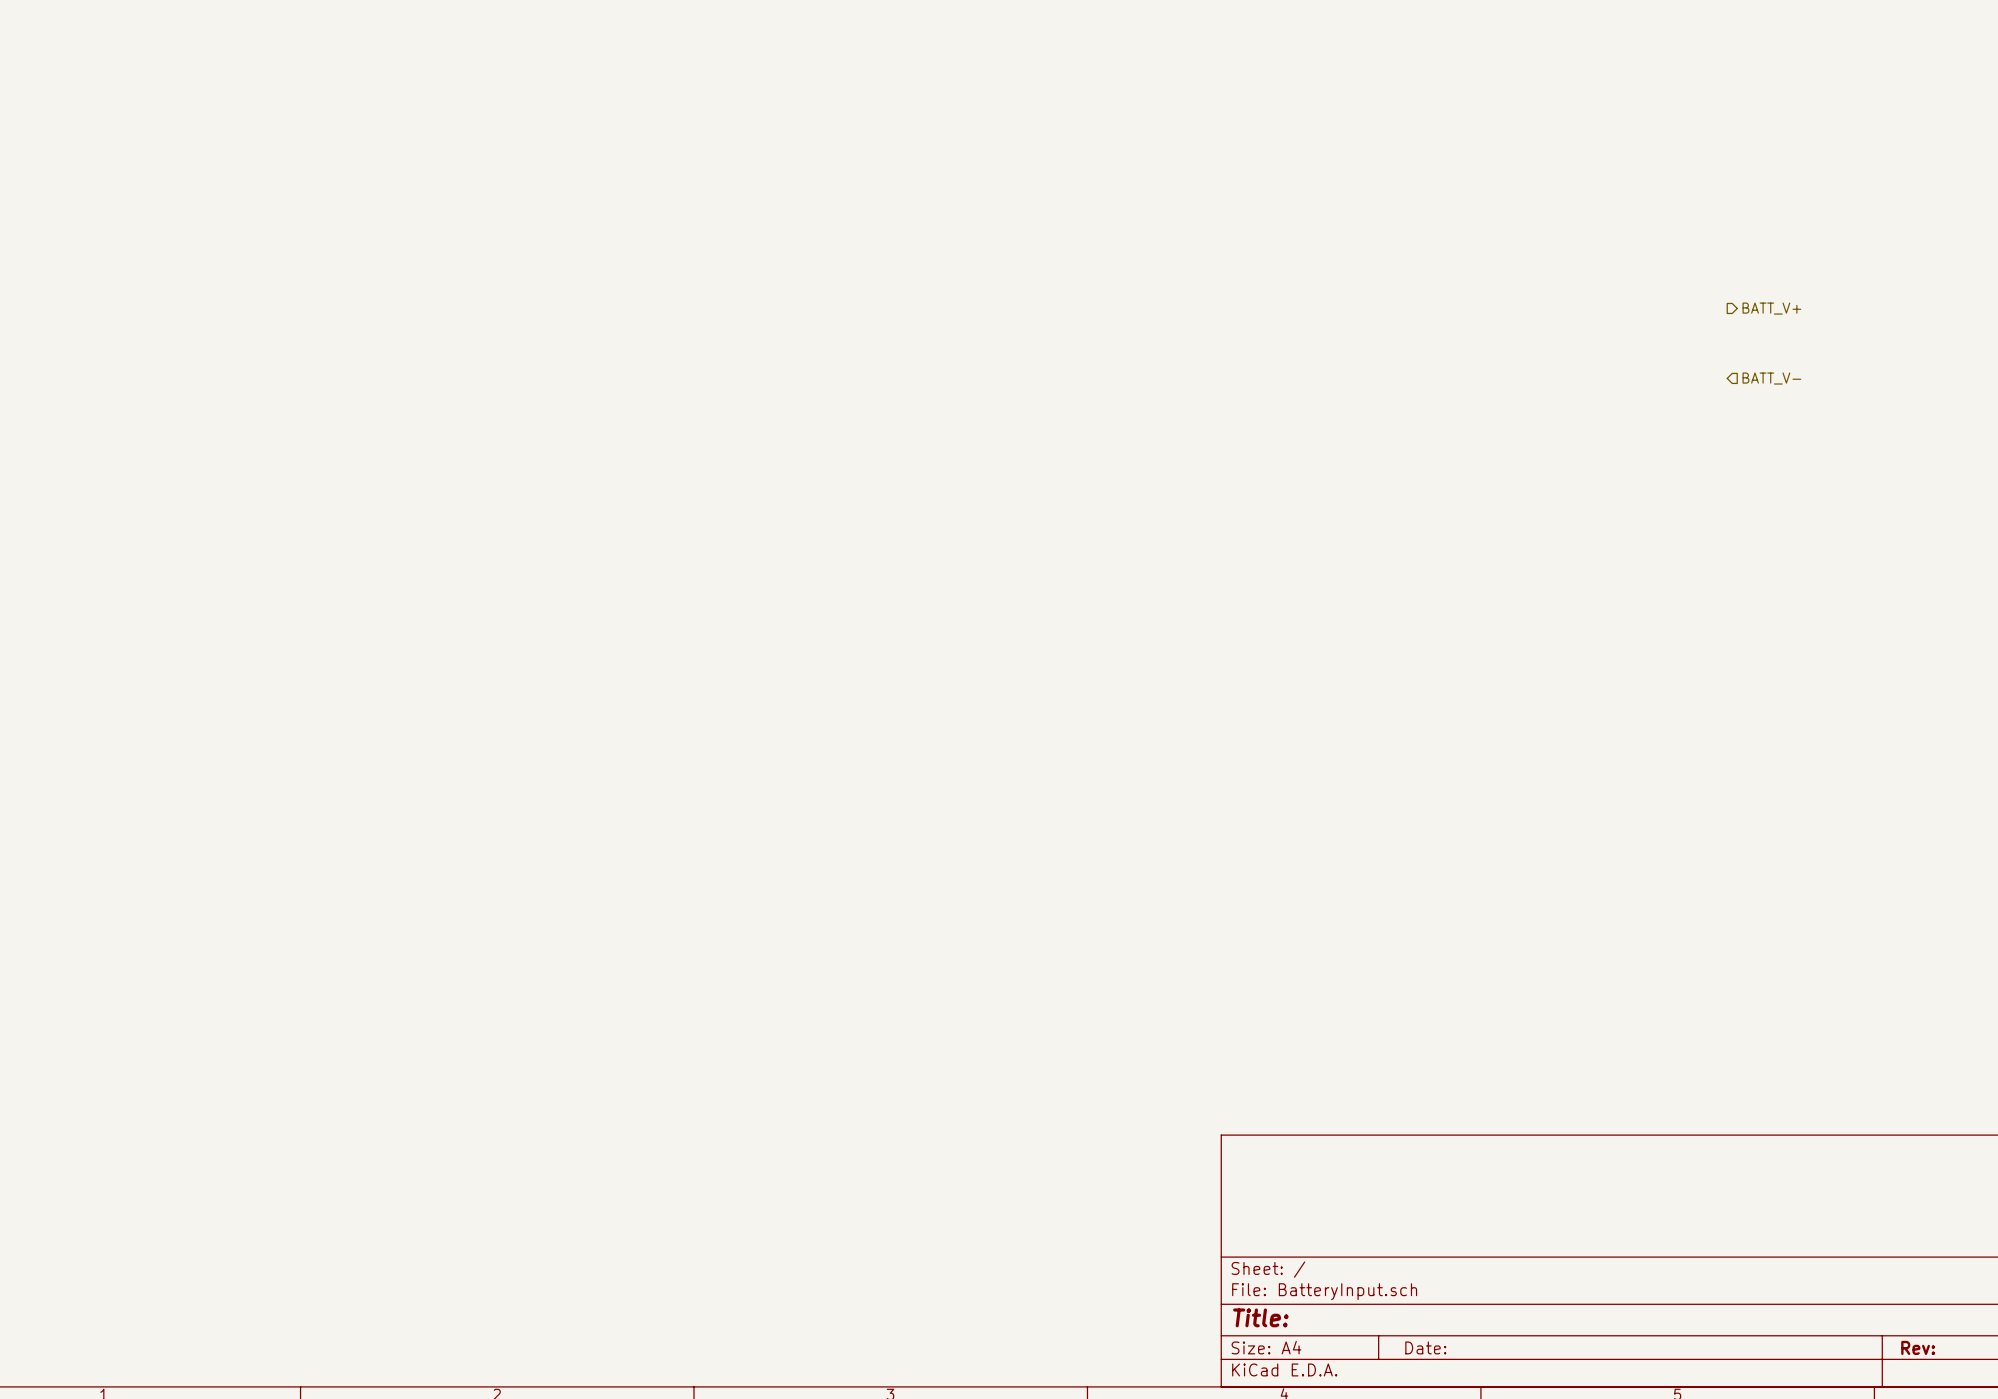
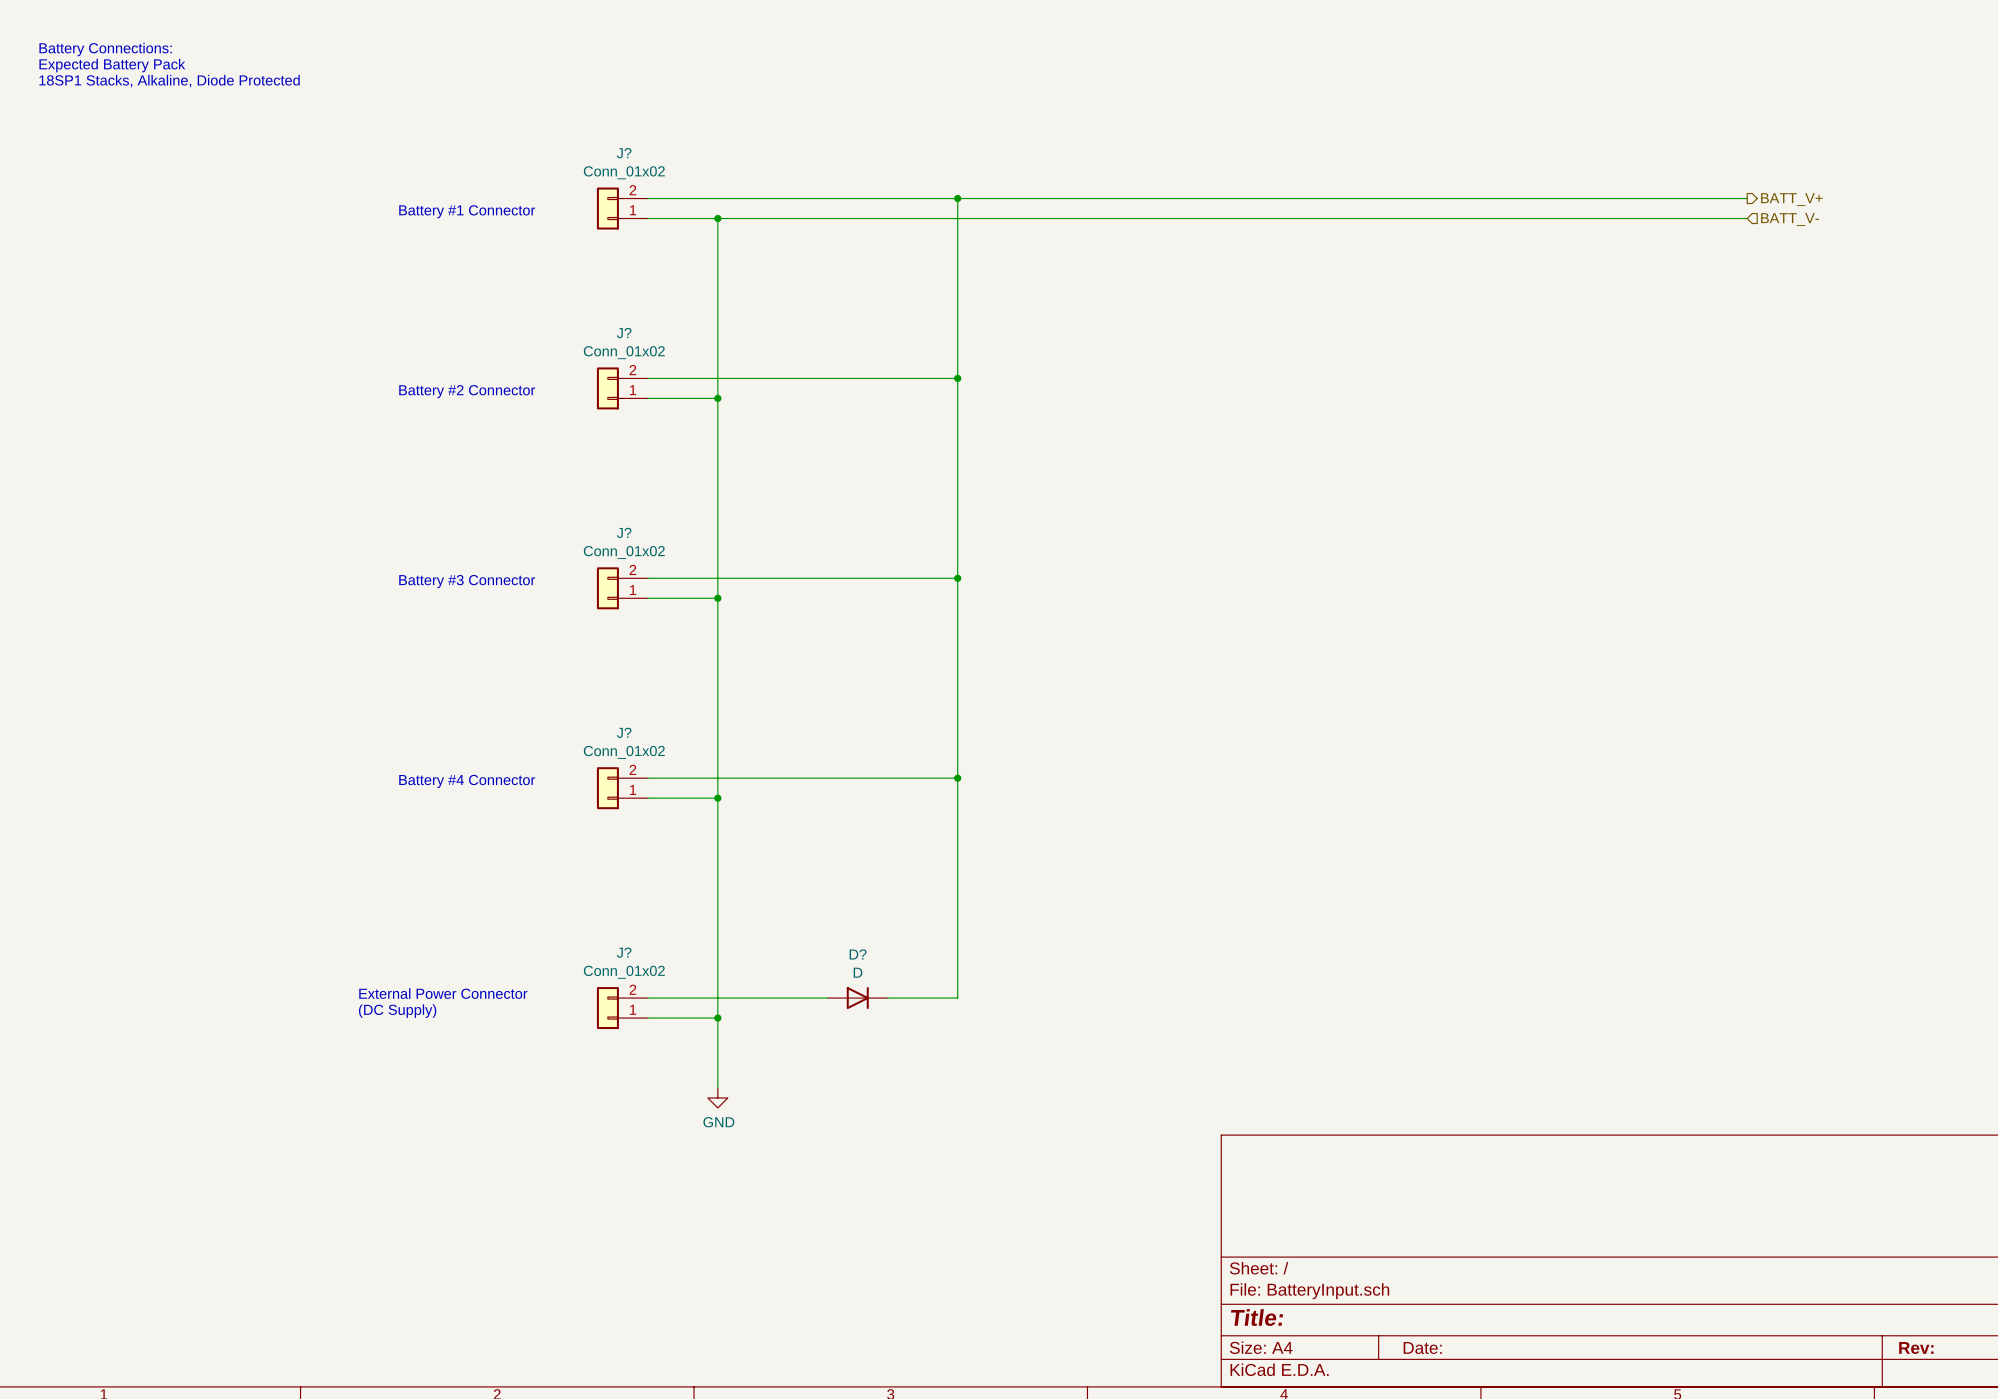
text: none -> Battery Connections: (105, 49)
text: none -> Expected Battery Pack (112, 65)
text: none -> 18SP1 Stacks, Alkaline, Diode Protected (169, 81)
wire: none -> (647, 198) (1747, 198)
wire: none -> (957, 198) (957, 998) (887, 998)
junction: none -> (957, 198)
J?: none -> Conn_01x02 (622, 208)
text: none -> Battery #1 Connector (467, 211)
wire: none -> (647, 218) (1747, 218)
wire: none -> (717, 218) (717, 1087)
junction: none -> (717, 218)
hierarchical label position: BATT_V+ (1771, 308) -> BATT_V+ (1791, 199)
wire: none -> (647, 378) (957, 378)
junction: none -> (957, 378)
hierarchical label position: BATT_V- (1771, 378) -> BATT_V- (1790, 219)
J?: none -> Conn_01x02 (622, 388)
text: none -> Battery #2 Connector (467, 391)
wire: none -> (647, 398) (717, 398)
junction: none -> (717, 398)
wire: none -> (647, 578) (957, 578)
junction: none -> (957, 578)
text: none -> Battery #3 Connector (467, 581)
J?: none -> Conn_01x02 (622, 588)
wire: none -> (647, 598) (717, 598)
junction: none -> (717, 598)
wire: none -> (647, 778) (957, 778)
junction: none -> (957, 778)
text: none -> Battery #4 Connector (467, 781)
J?: none -> Conn_01x02 (622, 788)
wire: none -> (647, 798) (717, 798)
junction: none -> (717, 798)
text: none -> External Power Connector (443, 993)
wire: none -> (647, 998) (827, 998)
D?: none -> D (857, 998)
J?: none -> Conn_01x02 (622, 1008)
text: none -> (DC Supply) (397, 1011)
wire: none -> (647, 1018) (717, 1018)
junction: none -> (717, 1018)
power symbol: none -> GND (717, 1097)

